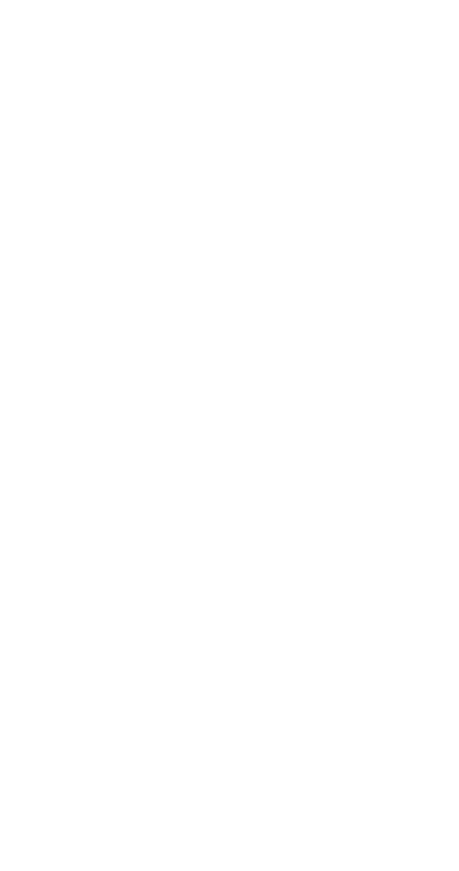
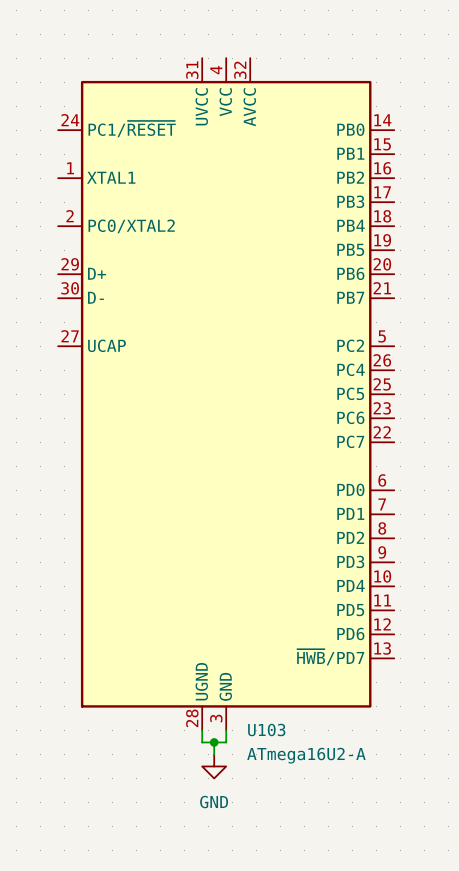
U103: none -> ATmega16U2-A (226, 394)
wire: none -> (202, 730) (202, 742) (226, 742) (226, 730)
wire: none -> (214, 742) (214, 754)
junction: none -> (214, 742)
power symbol: none -> GND (214, 766)

